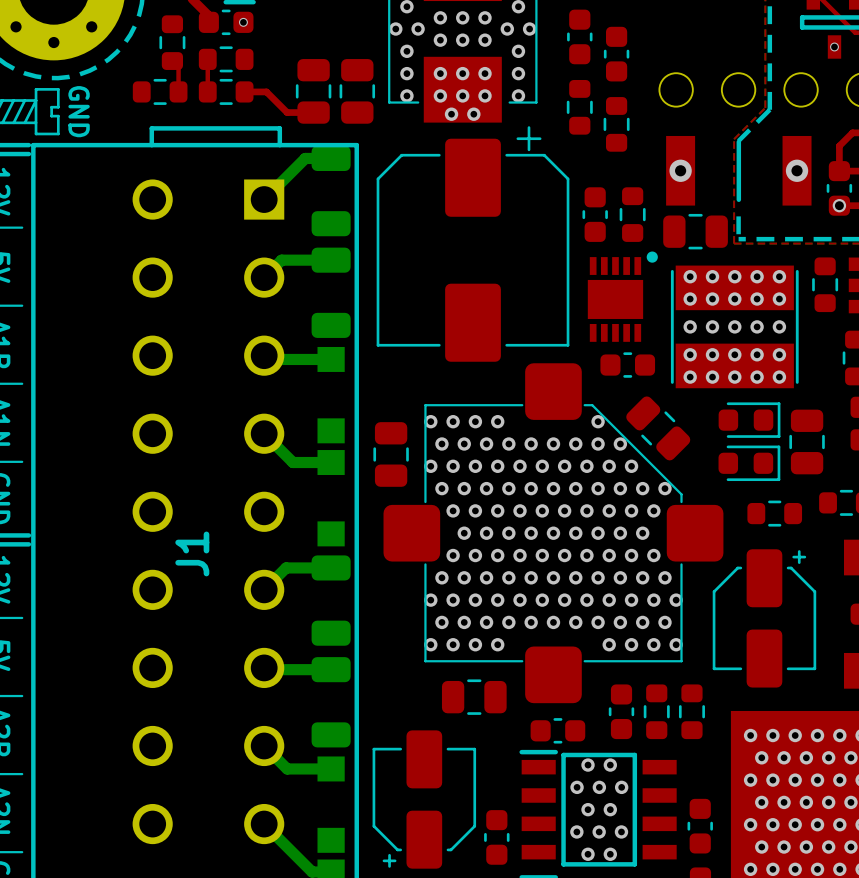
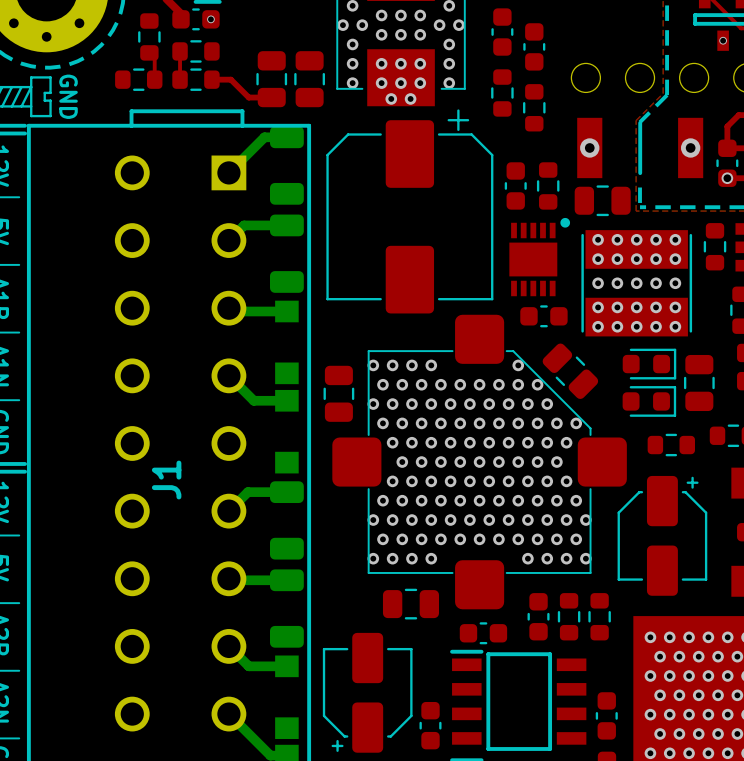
via: (588, 765) -> none
via: (610, 765) -> none
via: (577, 787) -> none
via: (599, 787) -> none
via: (621, 787) -> none
via: (588, 809) -> none
via: (610, 809) -> none
via: (576, 831) -> none
via: (599, 831) -> none
via: (621, 831) -> none
via: (588, 854) -> none
via: (610, 854) -> none

